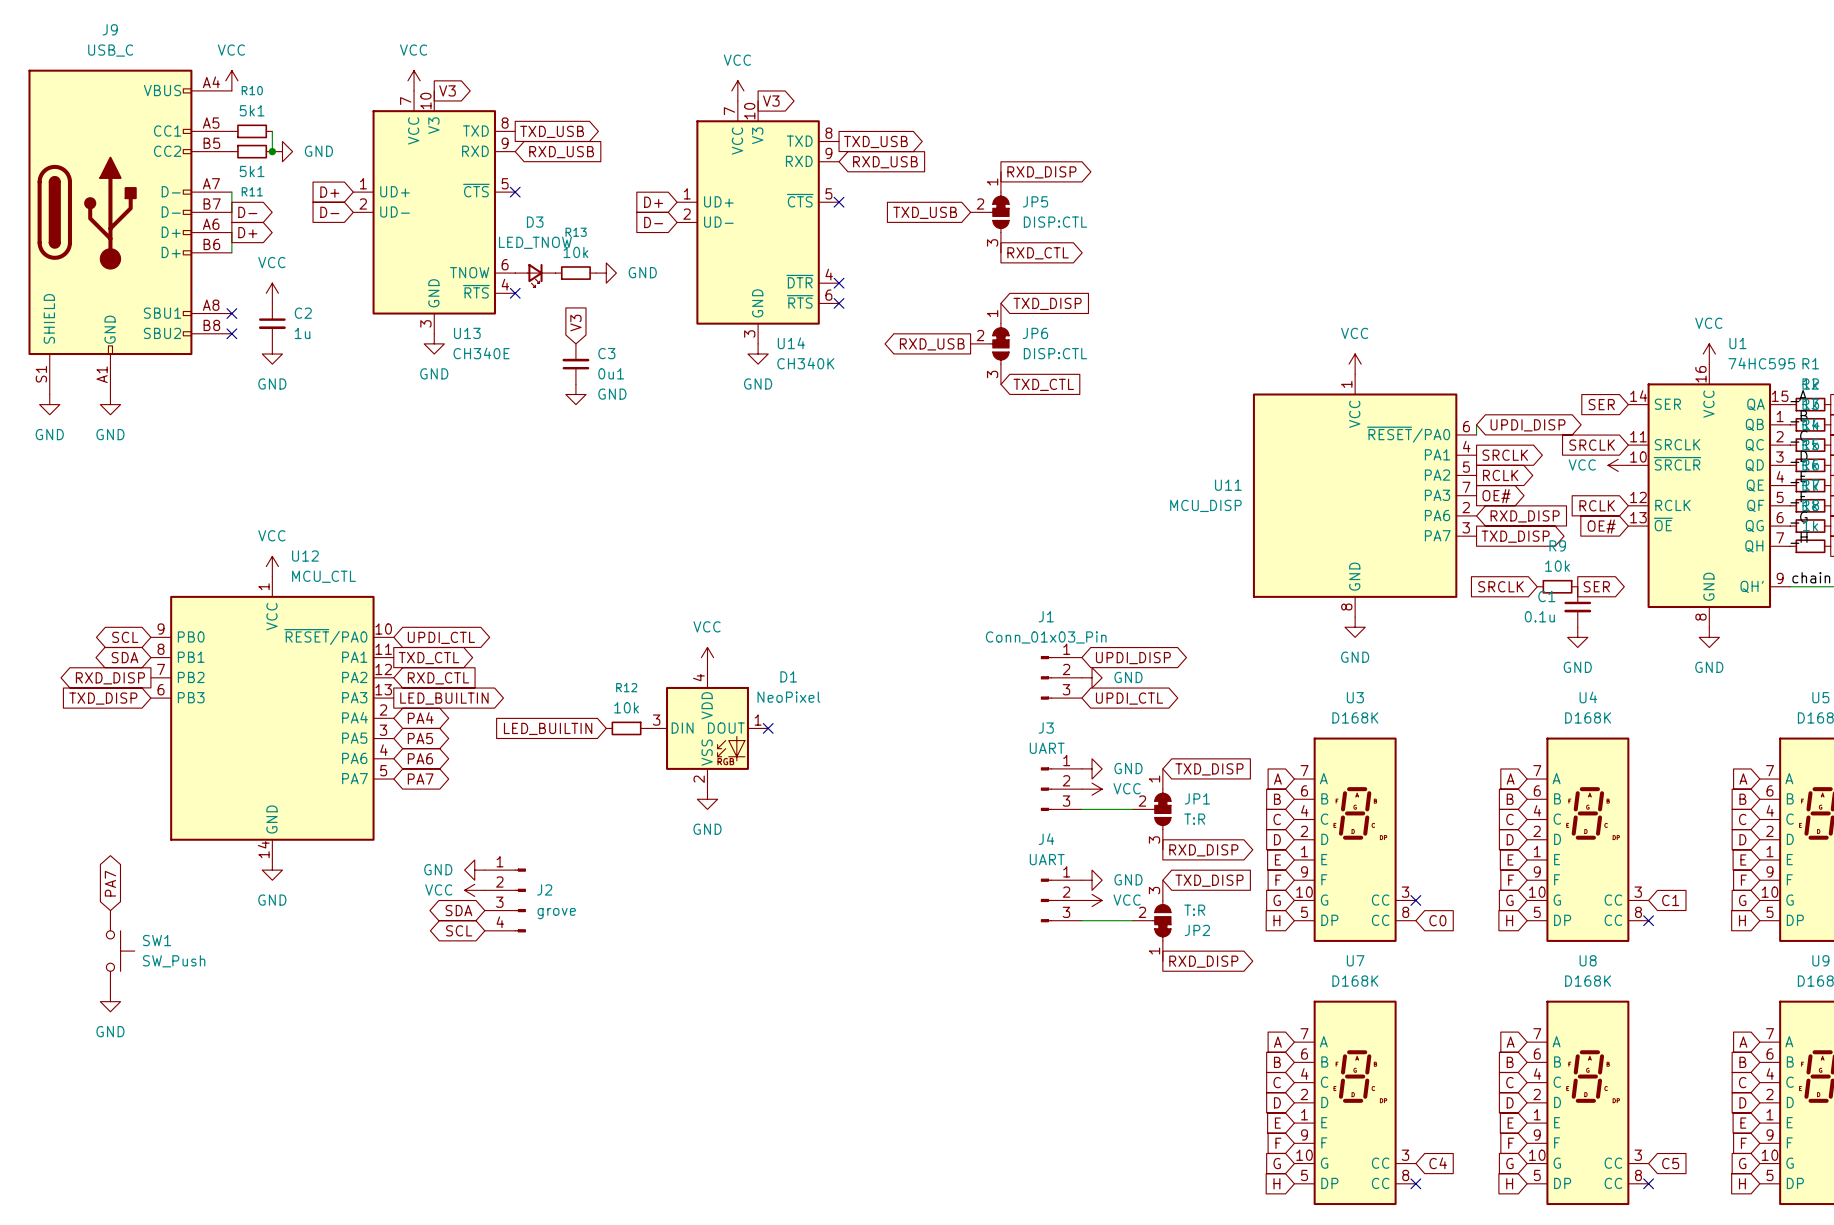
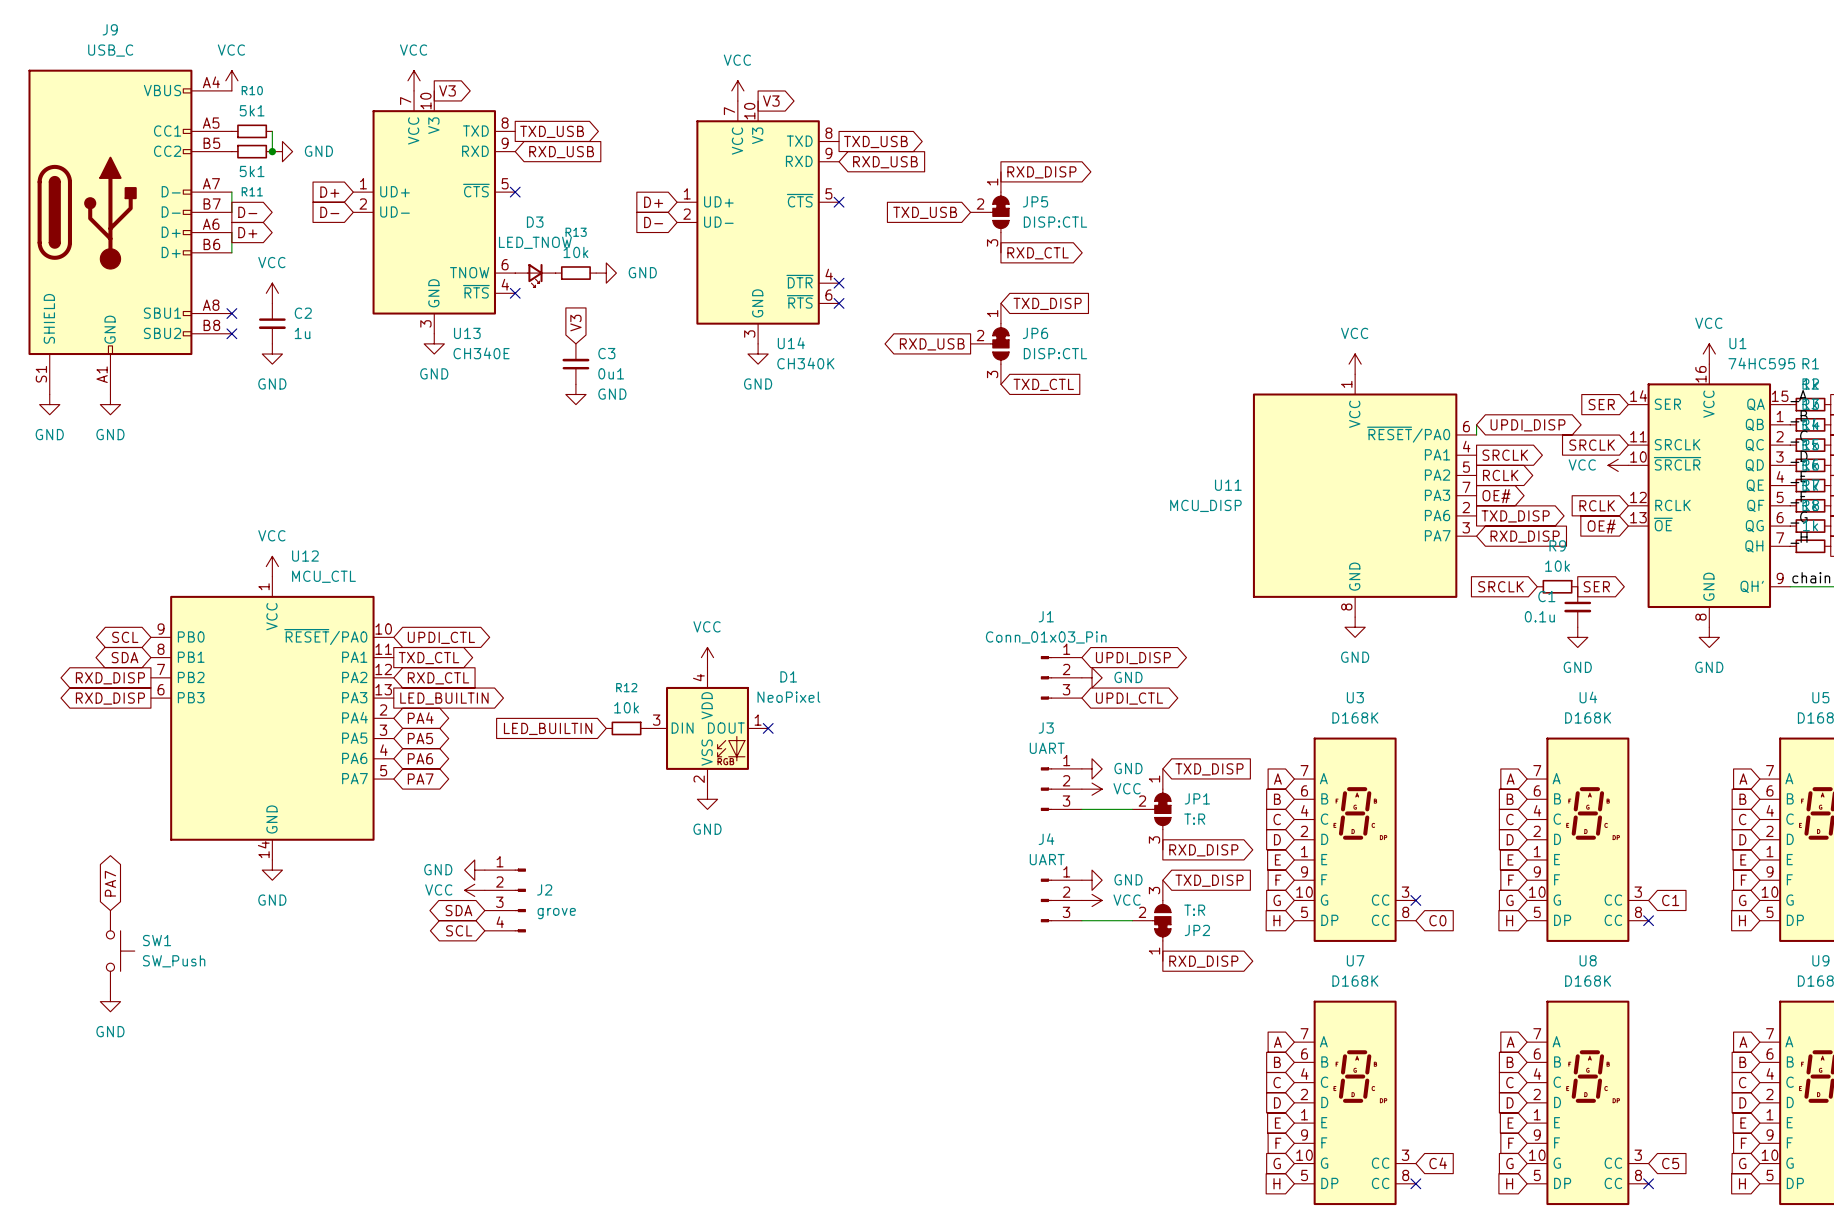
global label shape: input (1525, 516) -> output (1515, 516)
global label: RXD_DISP (1525, 516) -> TXD_DISP (1515, 516)
global label shape: output (1515, 536) -> input (1525, 536)
global label: TXD_DISP (1515, 536) -> RXD_DISP (1525, 536)
global label shape: input (103, 698) -> output (110, 698)
global label: TXD_DISP (103, 698) -> RXD_DISP (110, 698)

